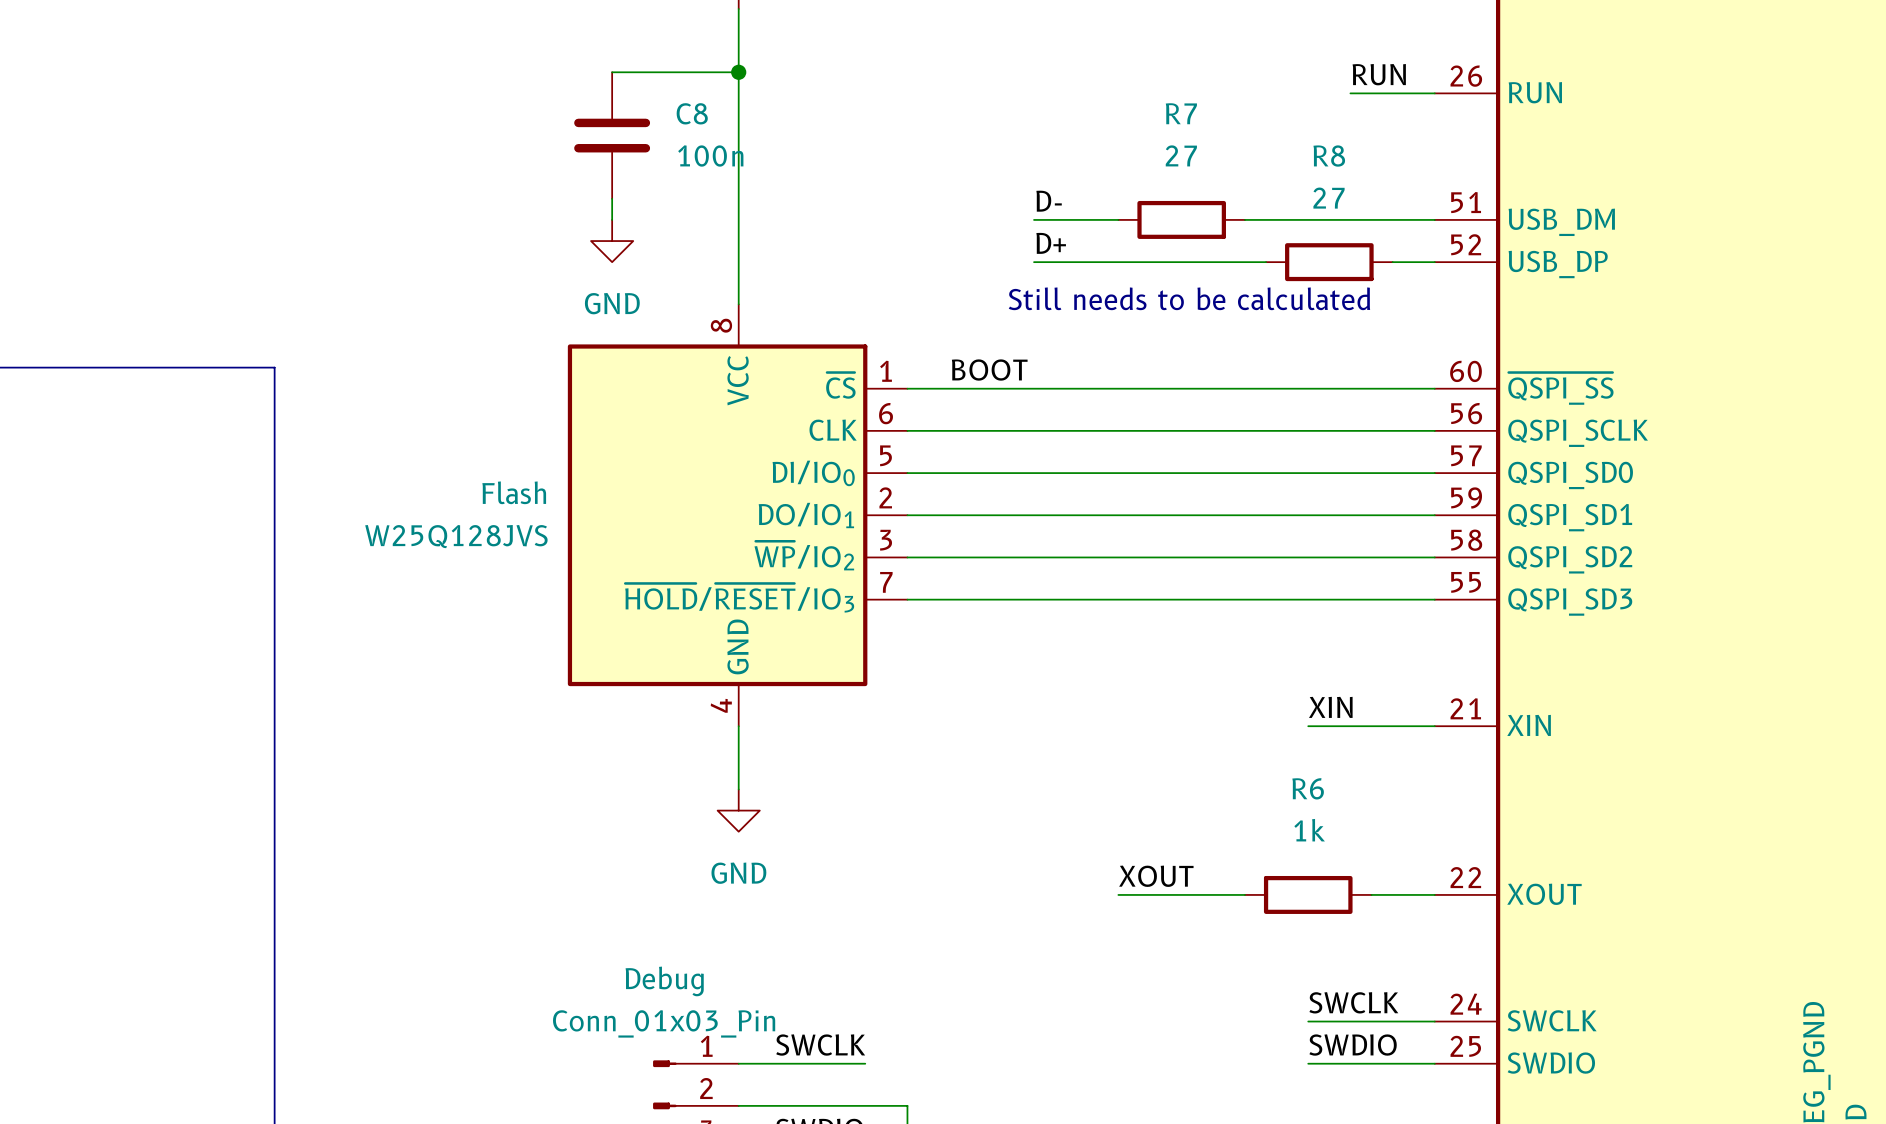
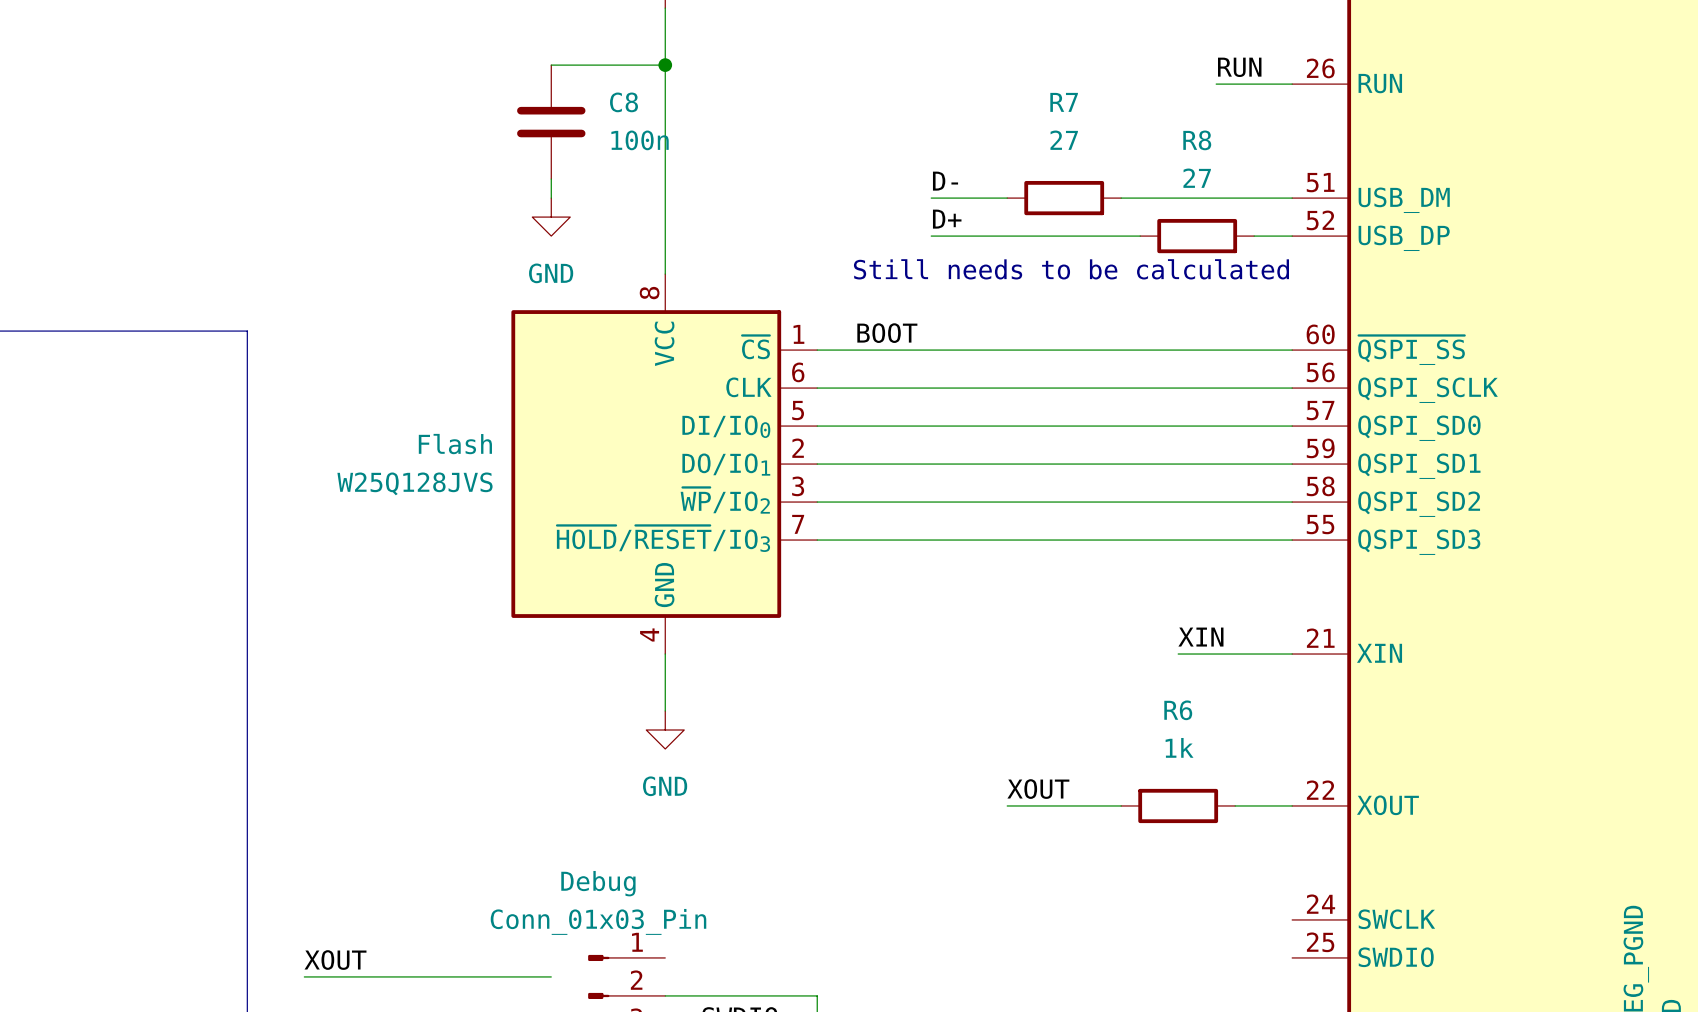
label: SWCLK (1353, 1002) -> none
wire: (1308, 1021) (1434, 1021) -> none
label: SWCLK (820, 1045) -> none
label: SWDIO (1353, 1045) -> none
wire: (738, 1063) (865, 1063) -> none
wire: (1308, 1063) (1434, 1063) -> none
label: none -> XOUT (335, 960)
wire: none -> (304, 976) (551, 976)

